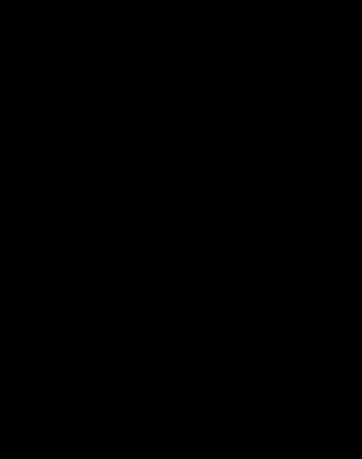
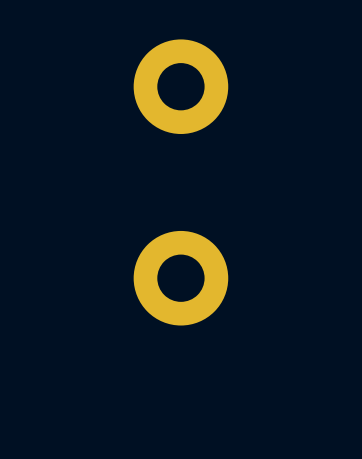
part: none -> (180, 86)
part: none -> (180, 278)

